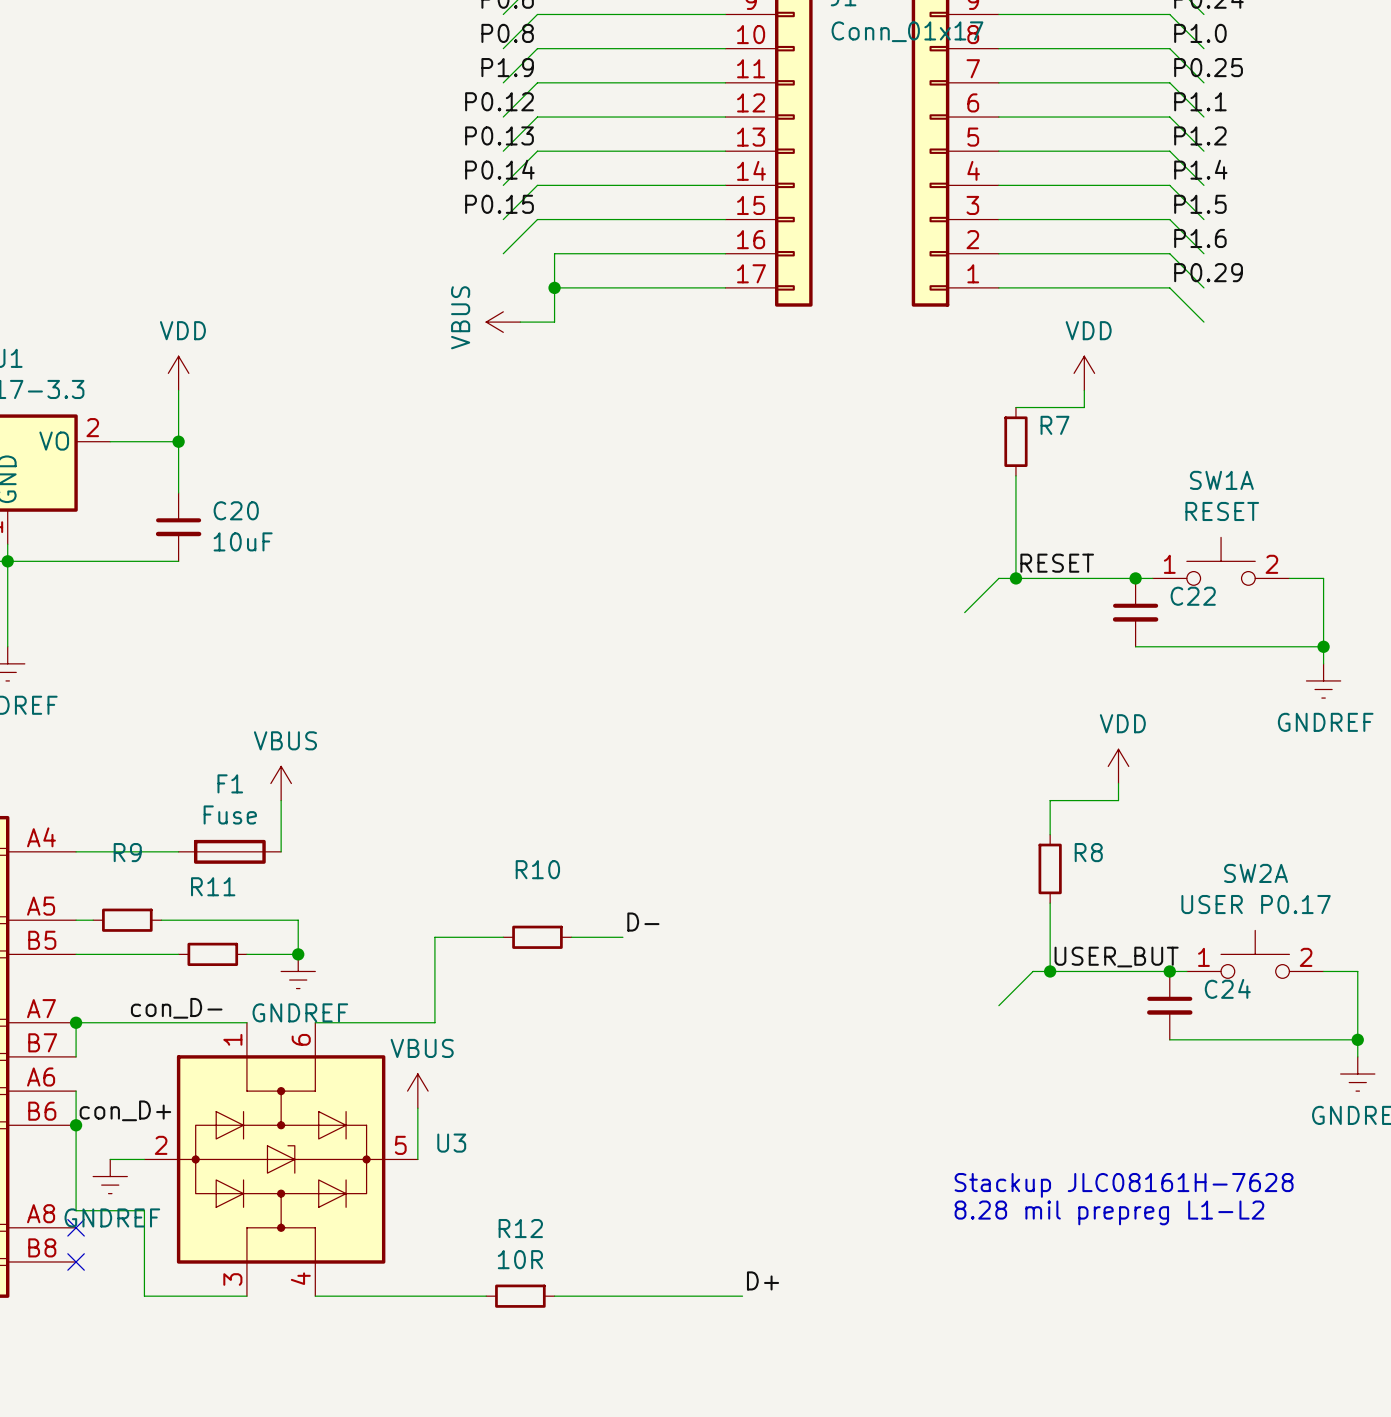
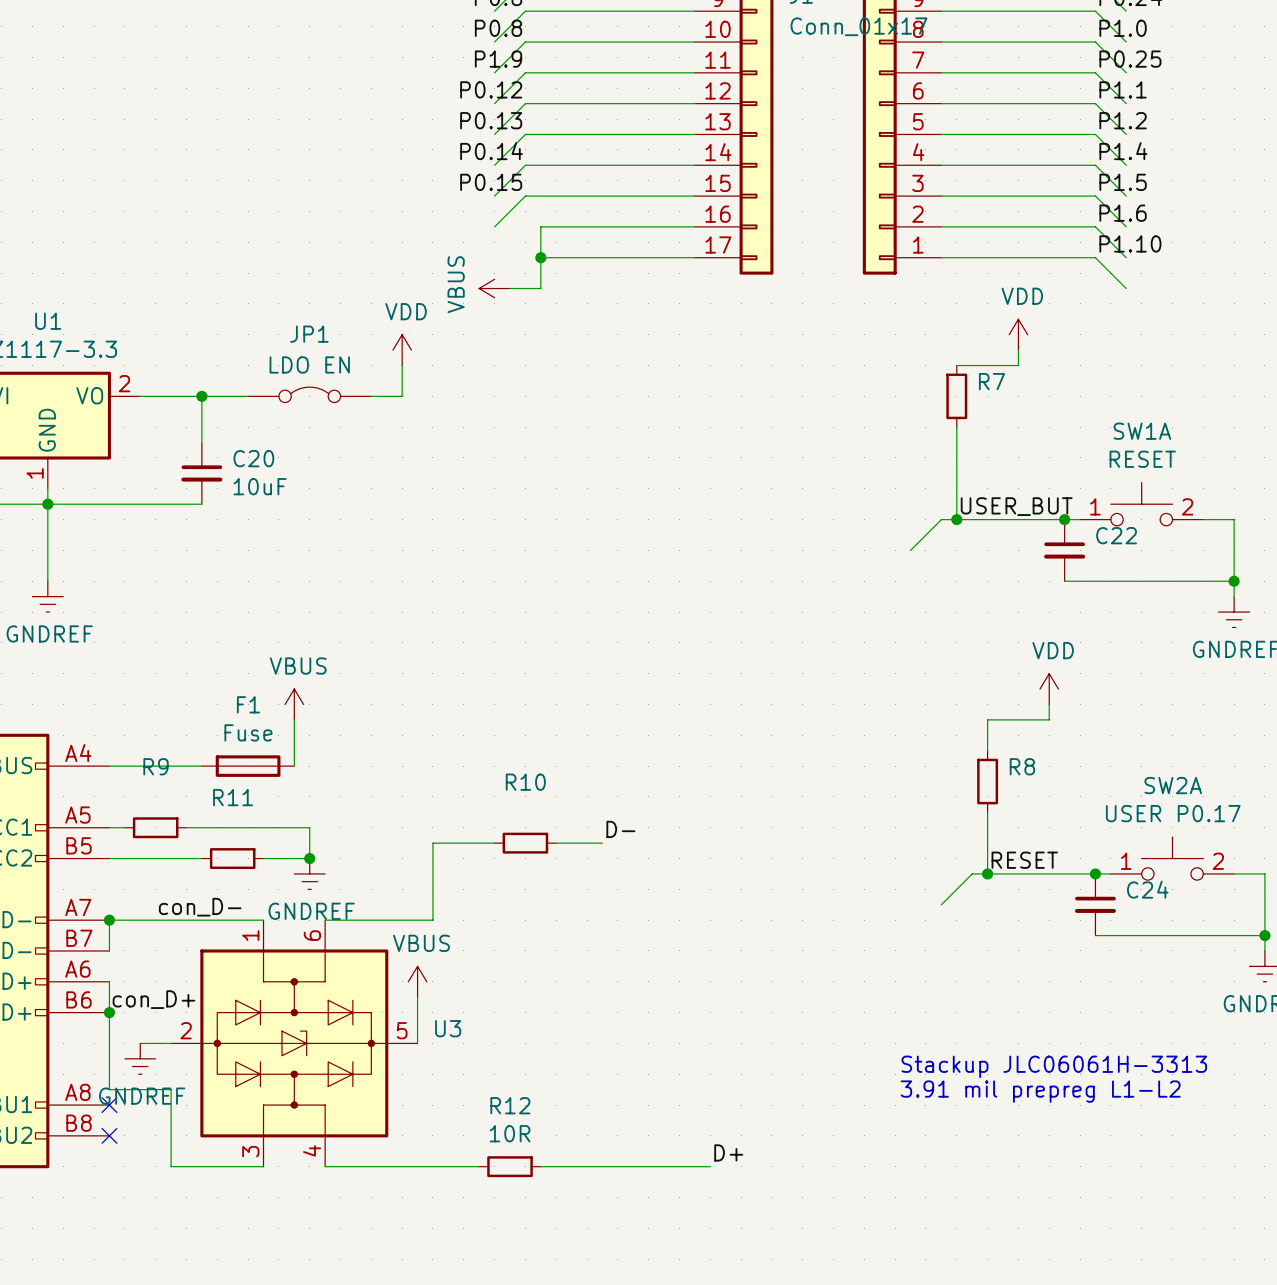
label: P0.29 (1208, 272) -> P1.10 (1130, 243)
power symbol position: VDD (178, 373) -> VDD (402, 350)
wire: (178, 390) (178, 441) -> (248, 396) (201, 396)
wire: none -> (402, 365) (402, 396) (371, 396)
JP1: none -> LDO EN (309, 394)
label: RESET (1057, 563) -> USER_BUT (1016, 506)
label: USER_BUT (1116, 957) -> RESET (1024, 860)
text: Stackup JLC08161H-7628 (1124, 1185) -> Stackup JLC06061H-3313 (1054, 1066)
text: 8.28 mil prepreg L1-L2 (1109, 1212) -> 3.91 mil prepreg L1-L2 (1040, 1091)

